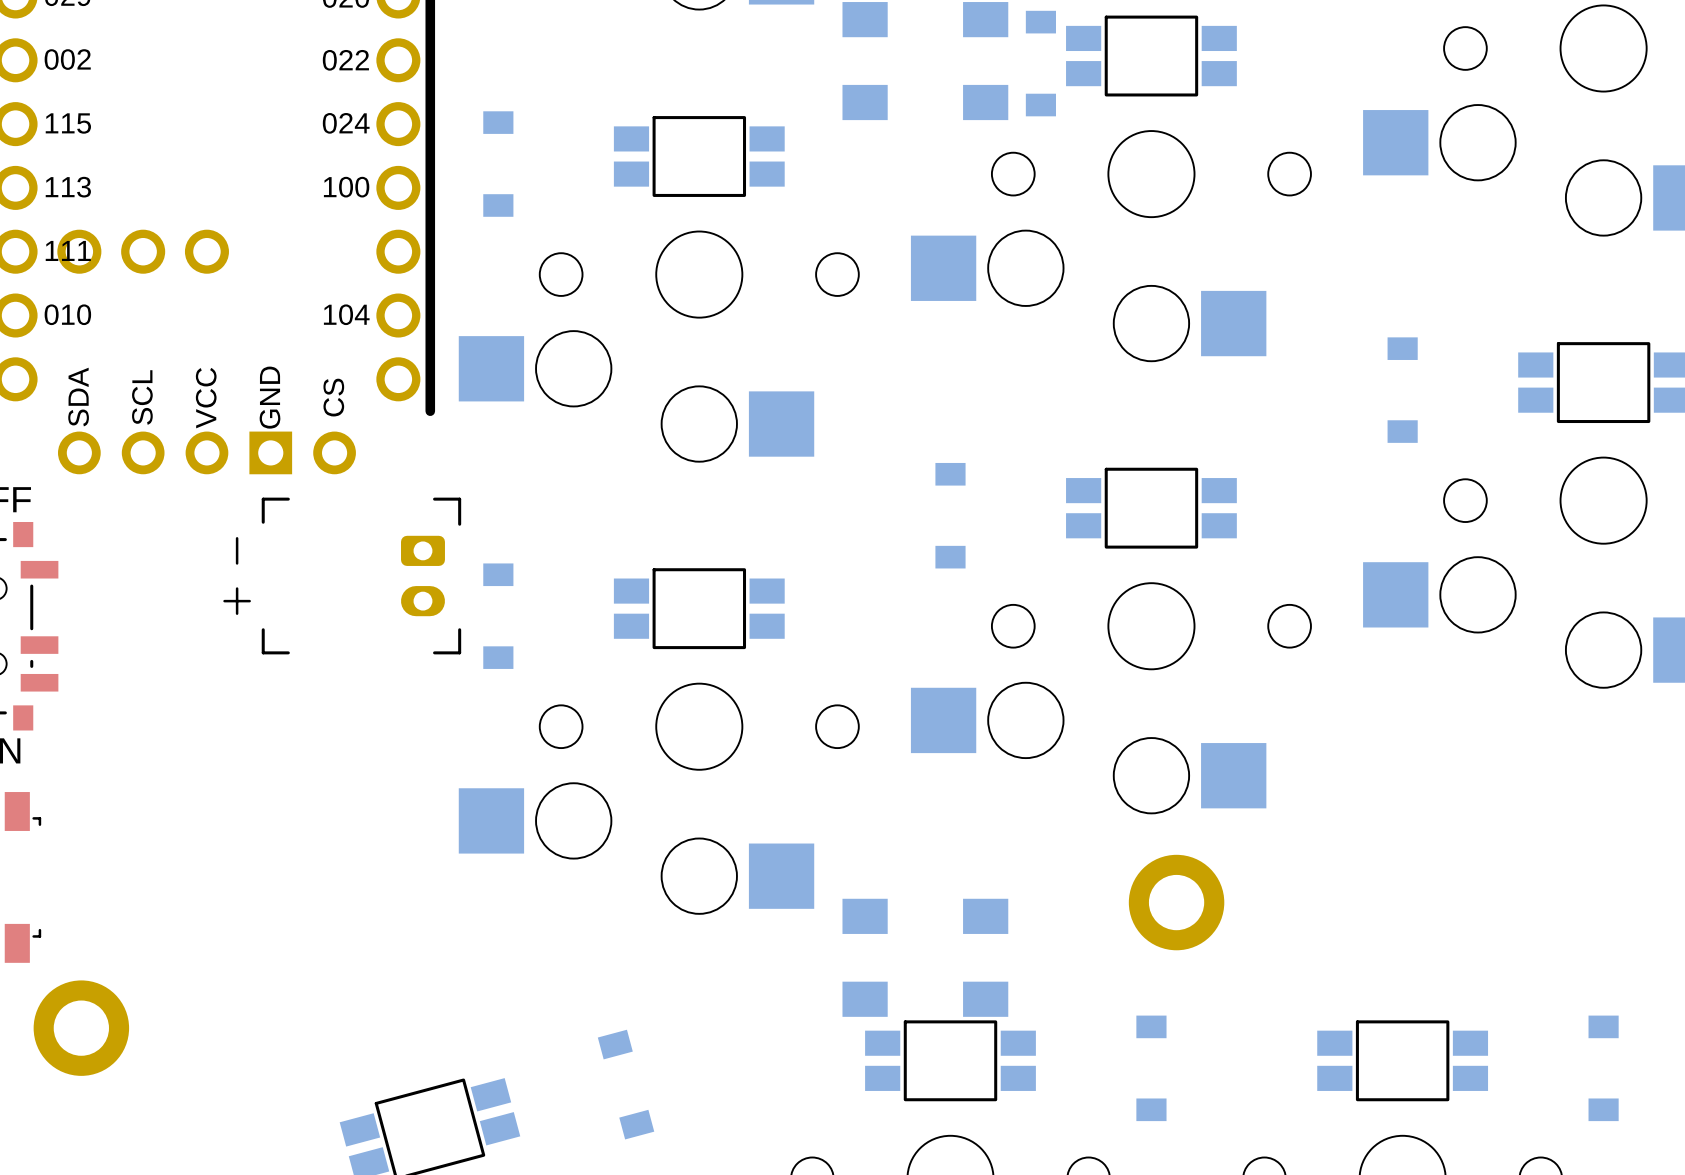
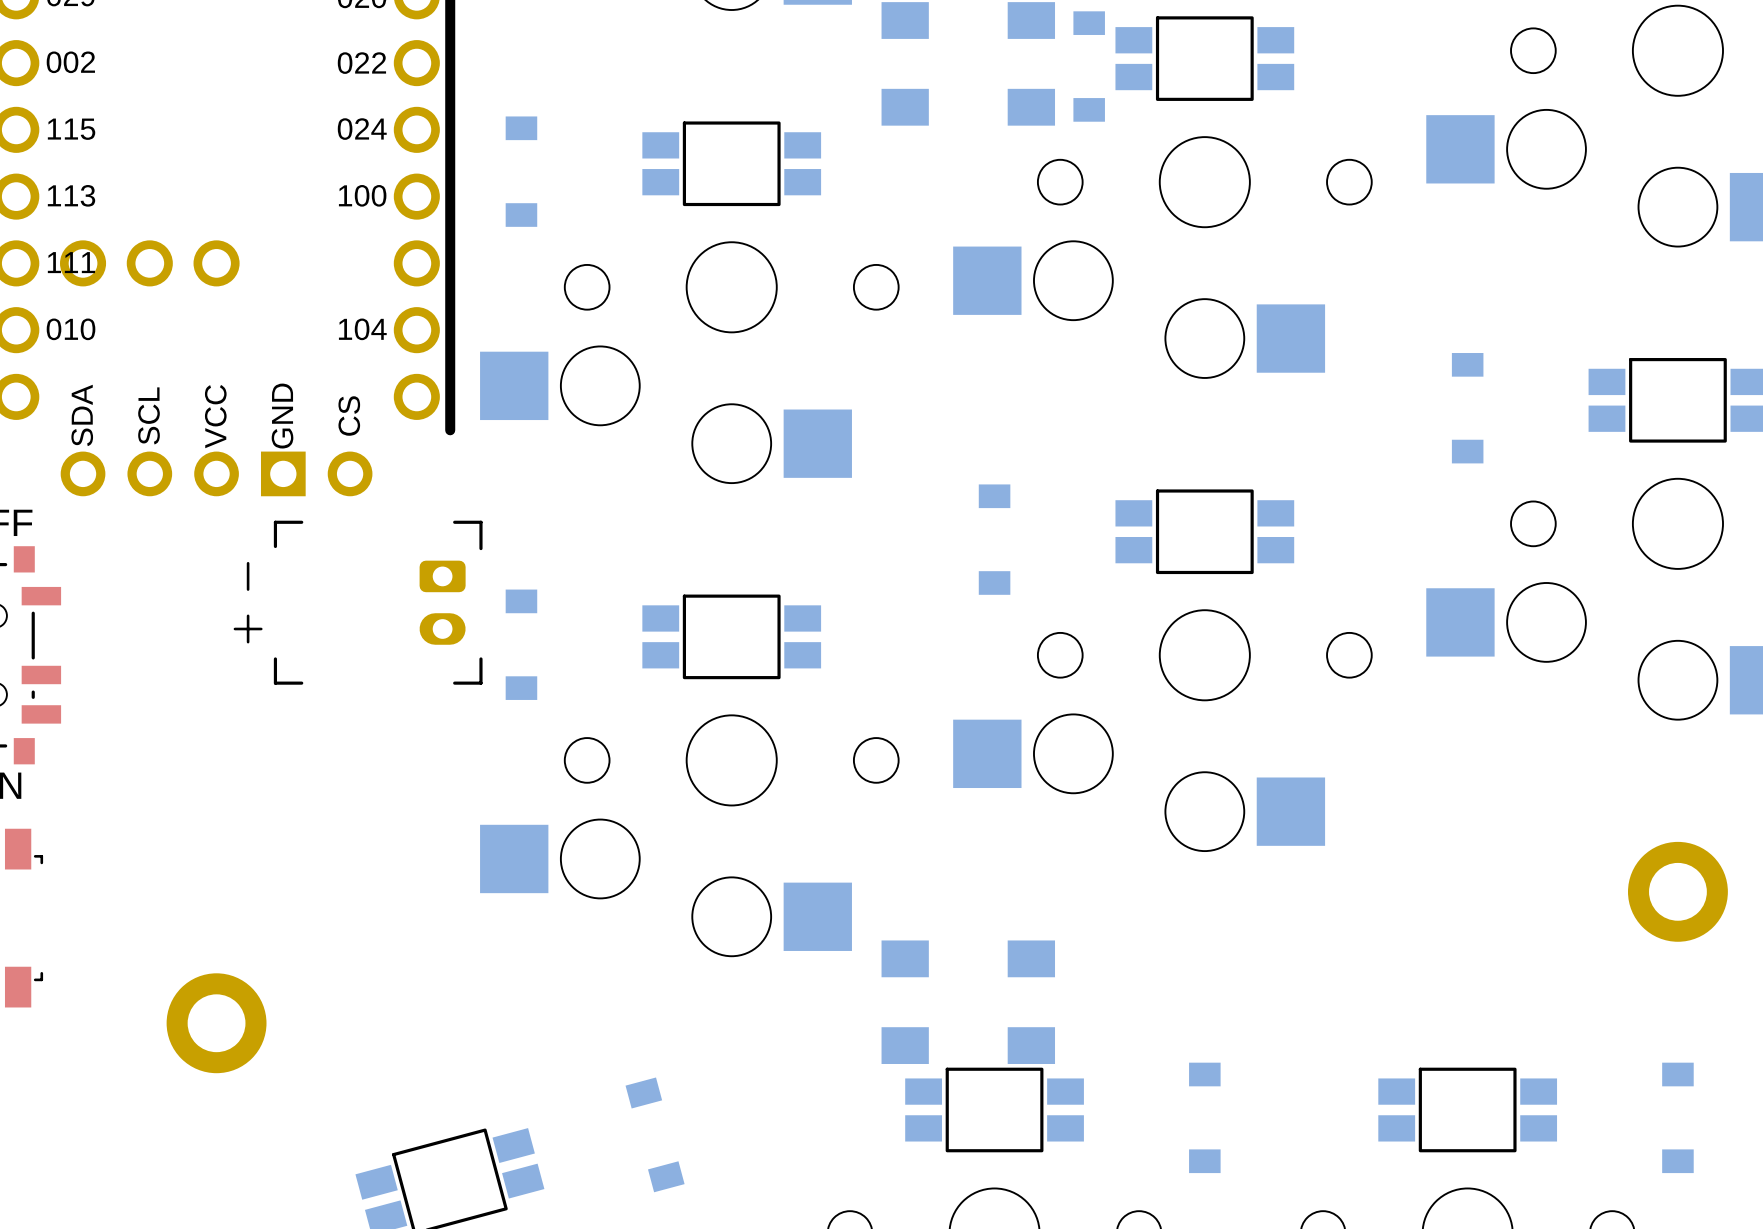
part position: (1176, 902) -> (1677, 891)
part position: (81, 1028) -> (216, 1023)

